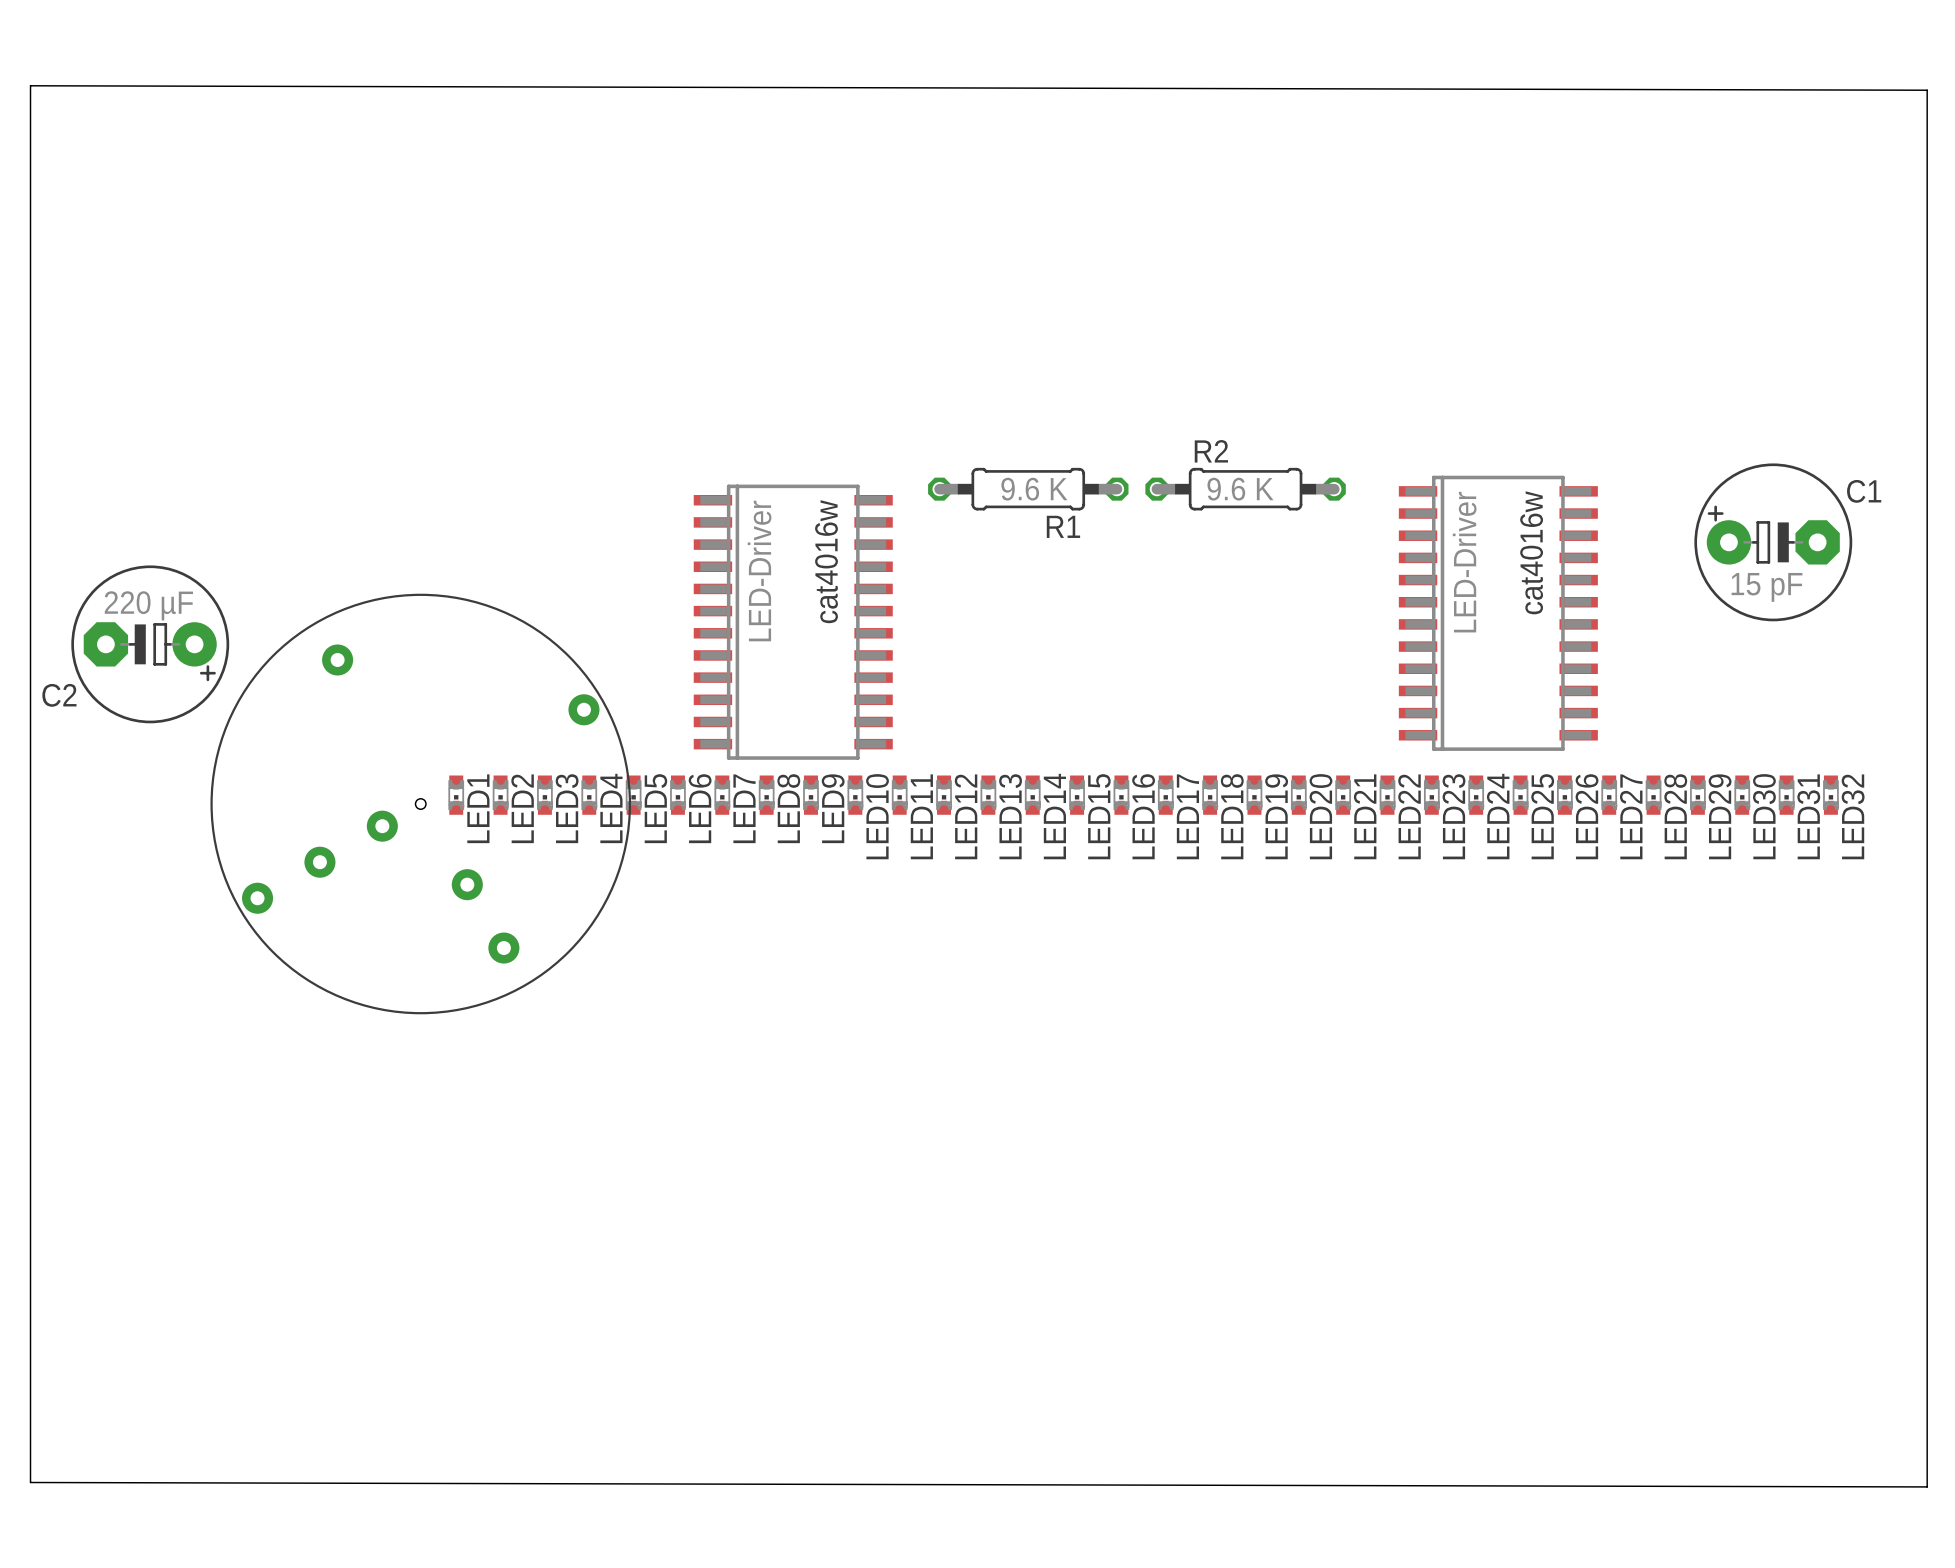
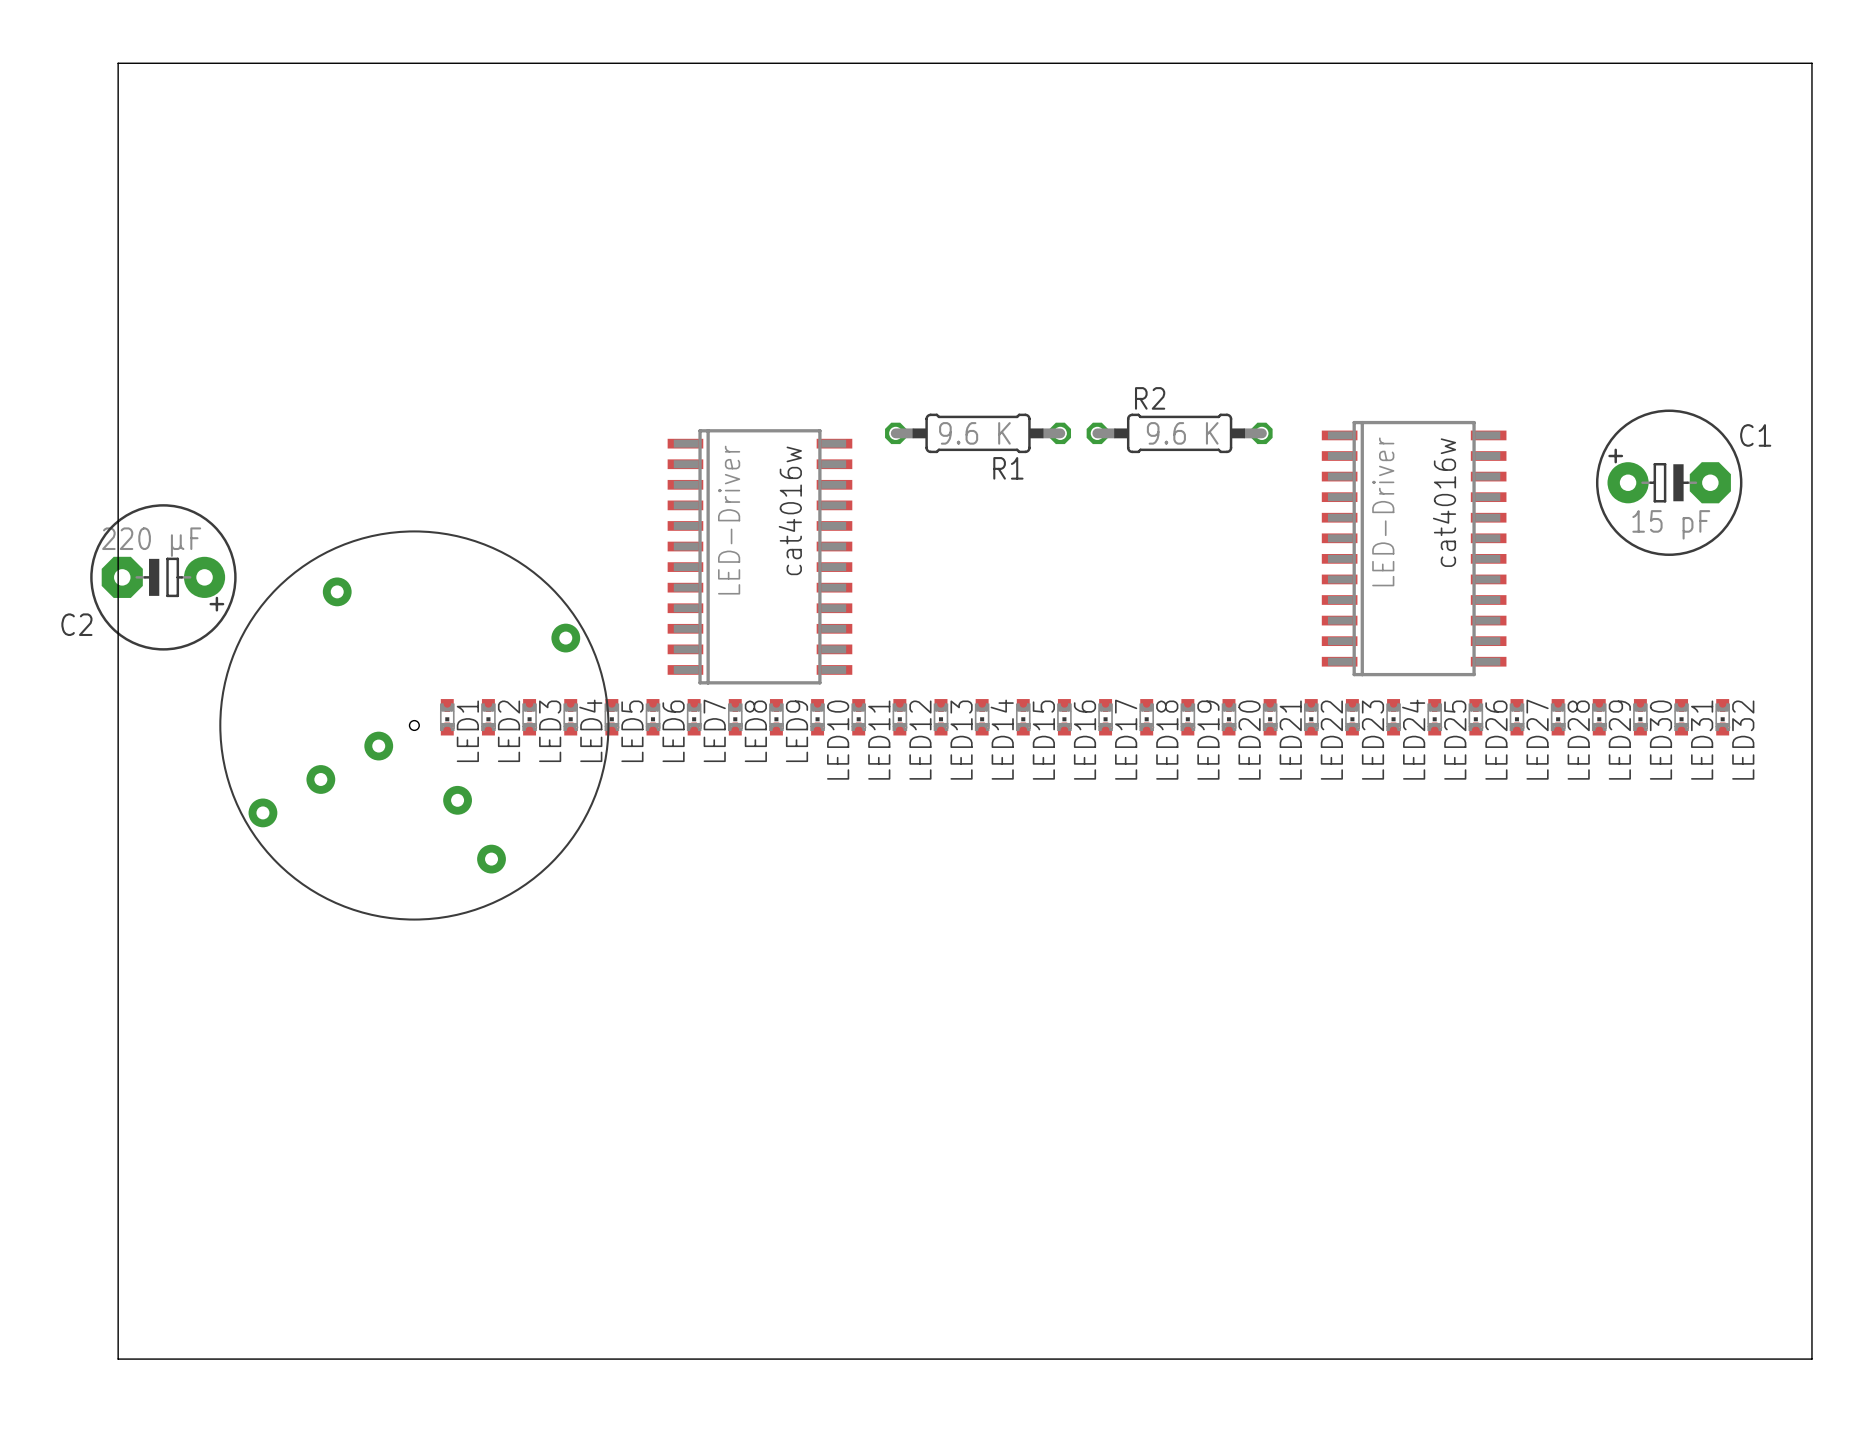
board edge: (1927, 90) (30, 85) (30, 1482) (1927, 1486) -> (1811, 63) (118, 63) (118, 1359) (1811, 1359)

